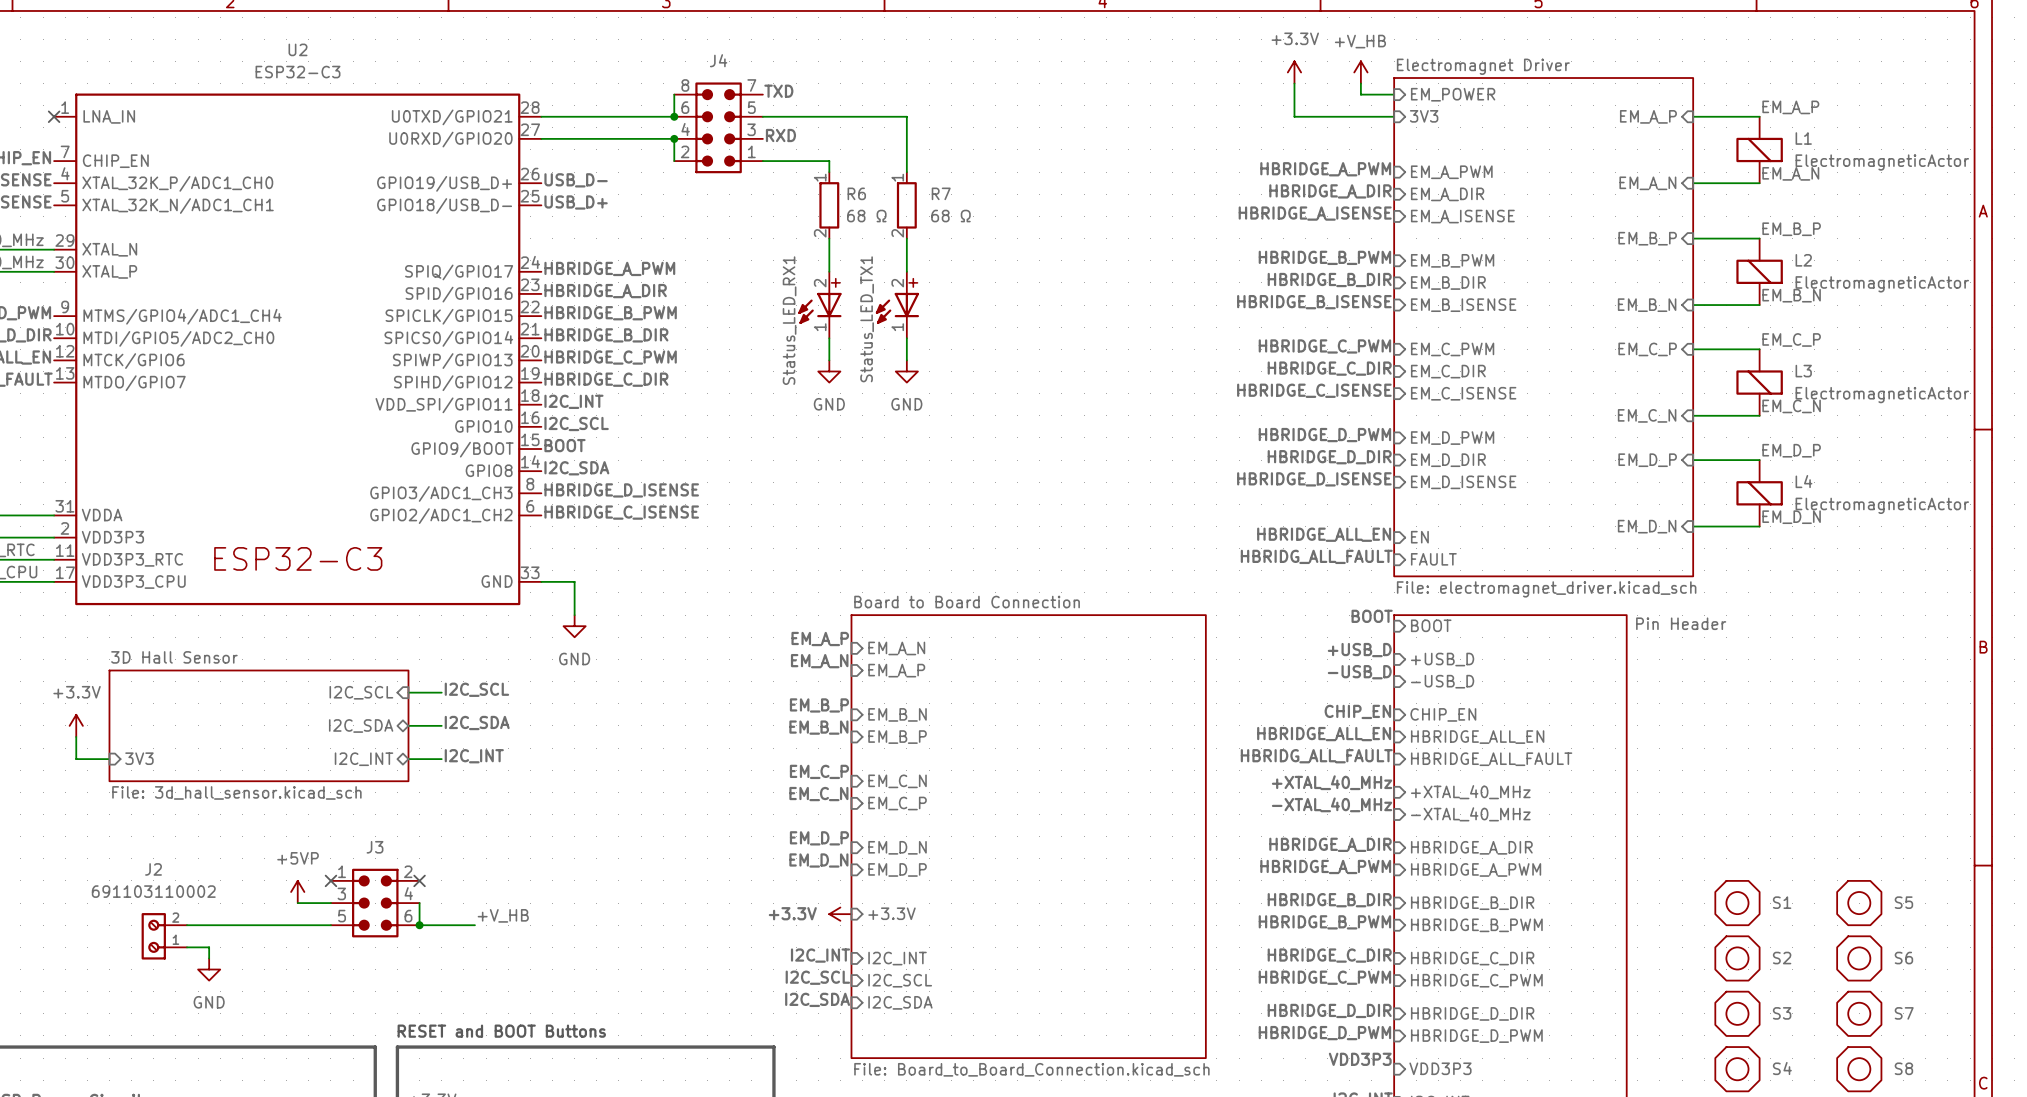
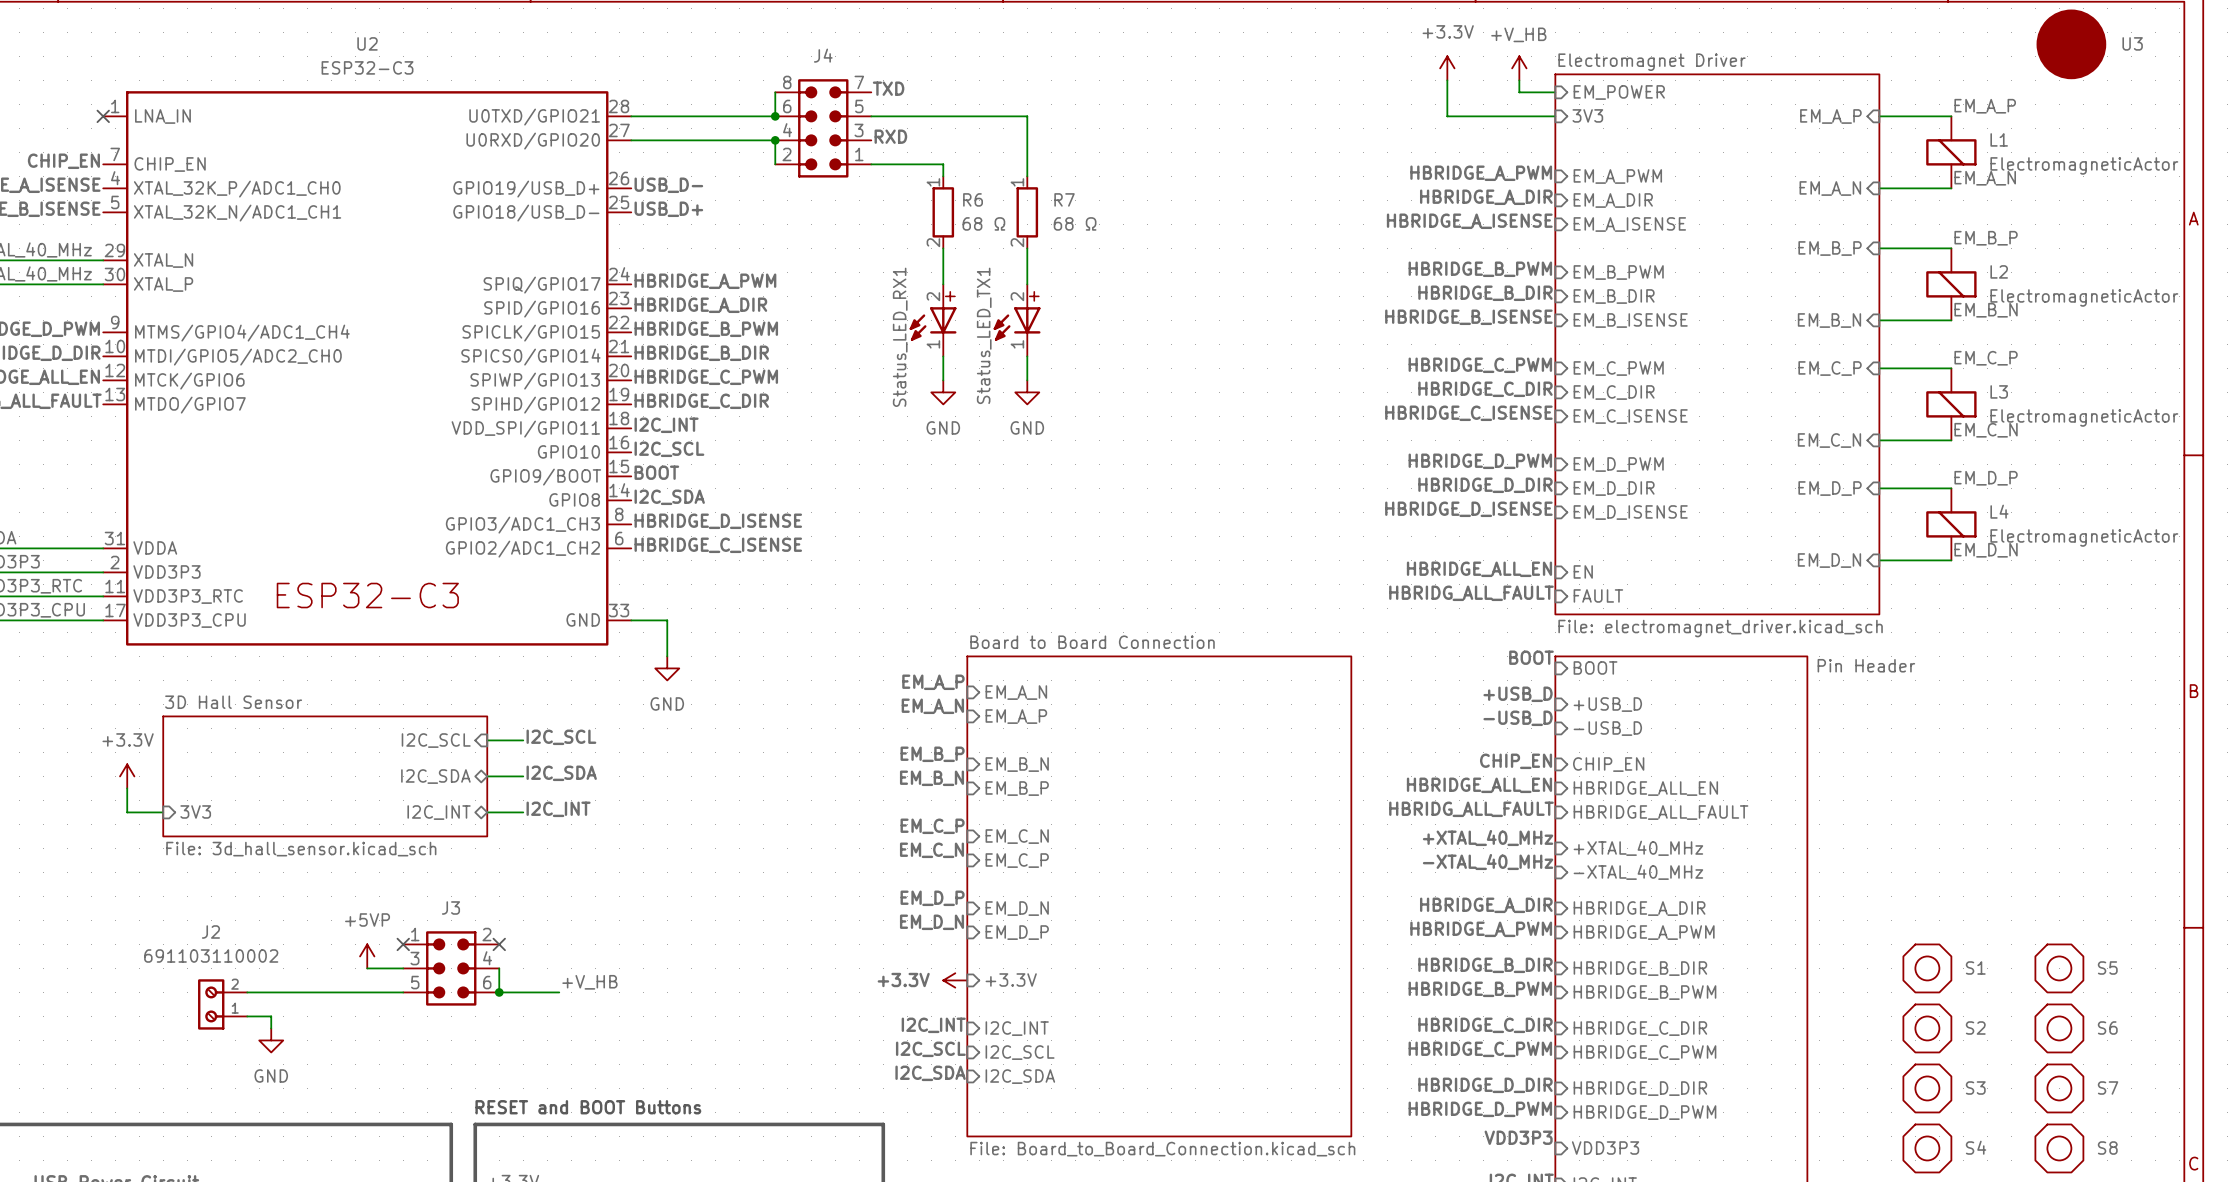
U3: none -> (2071, 44)

